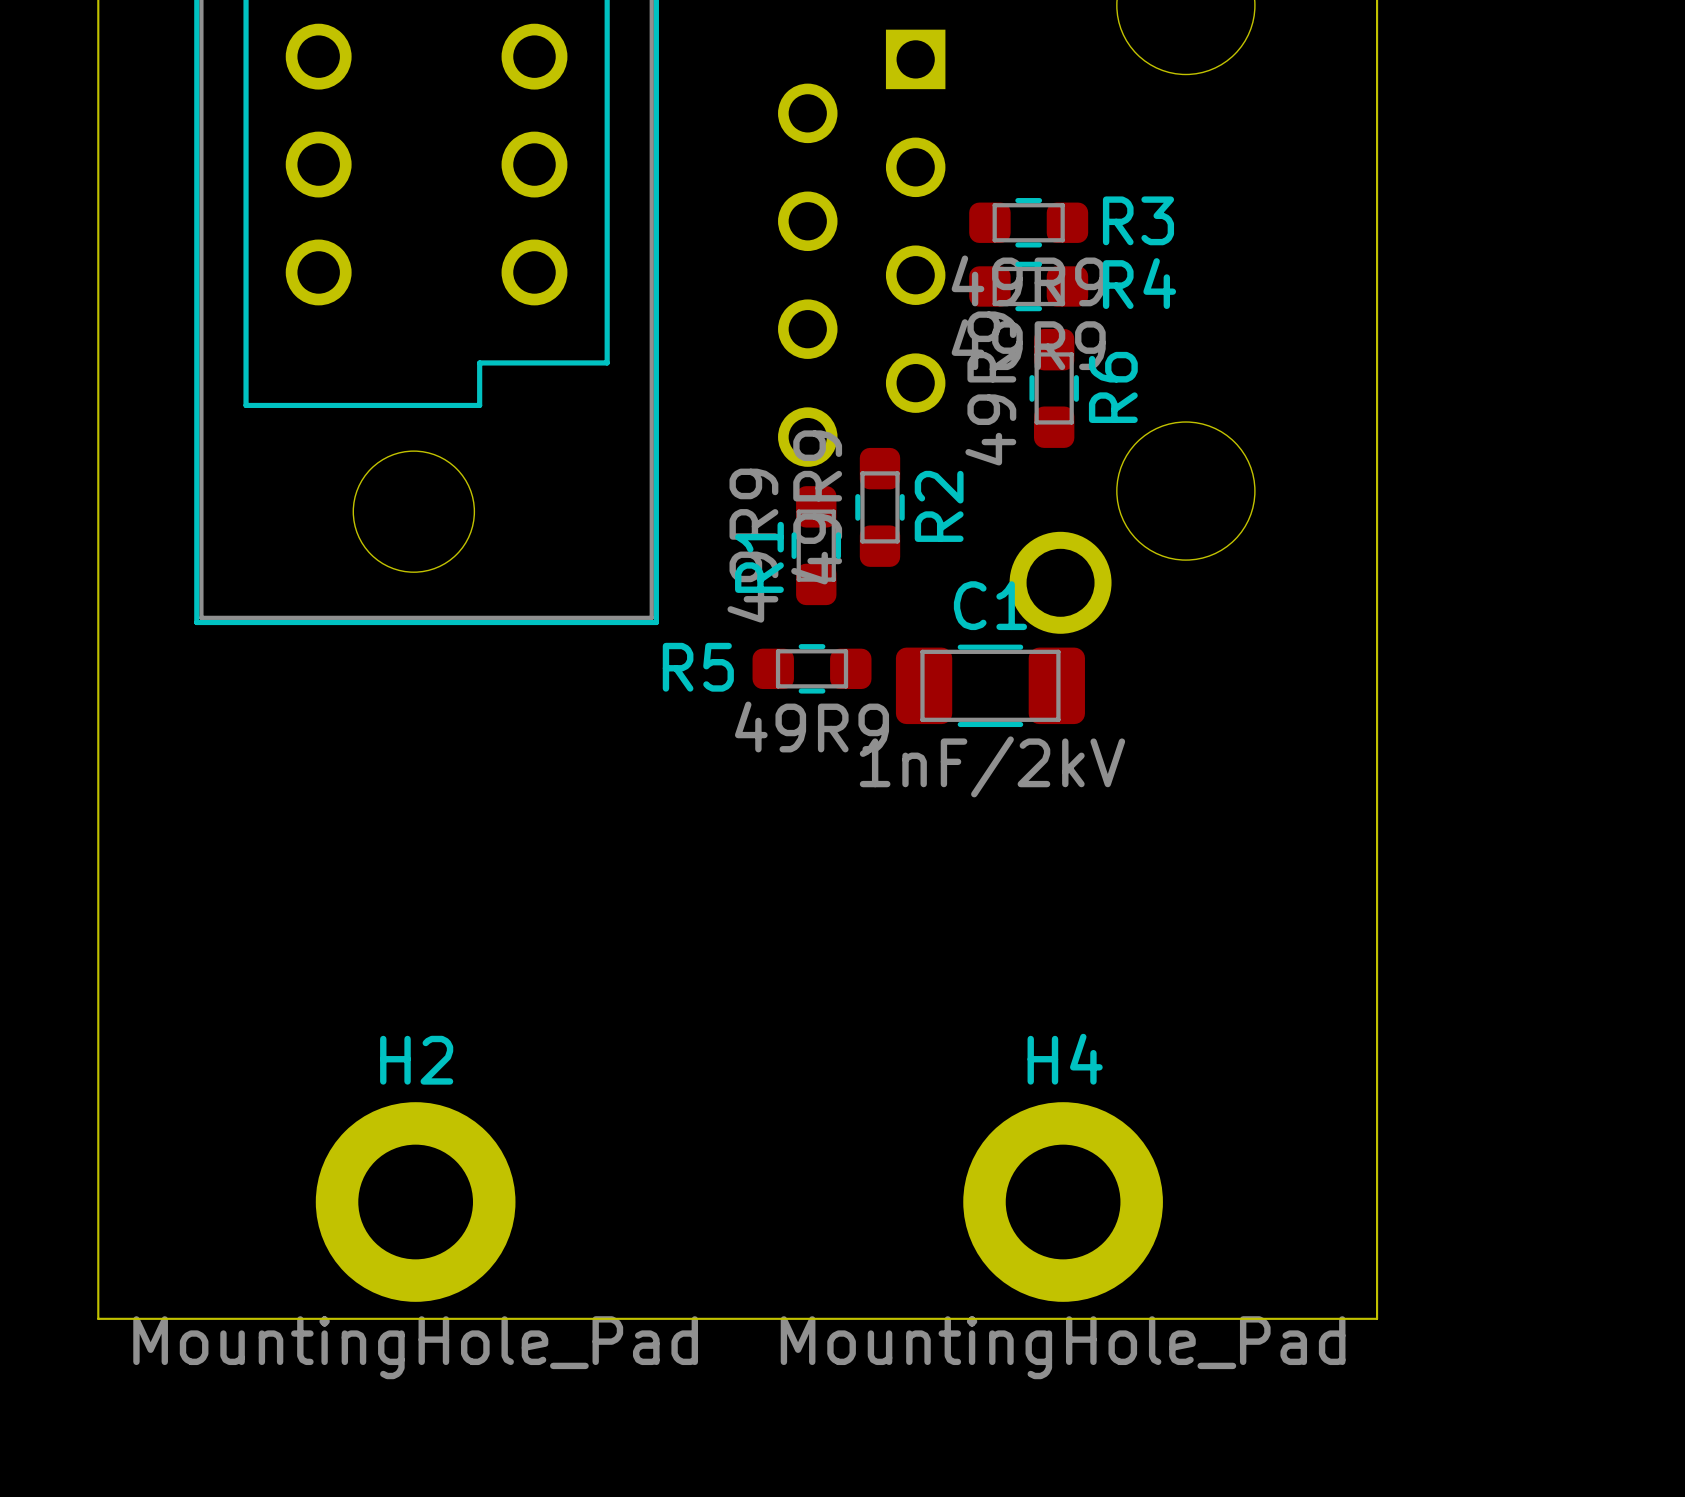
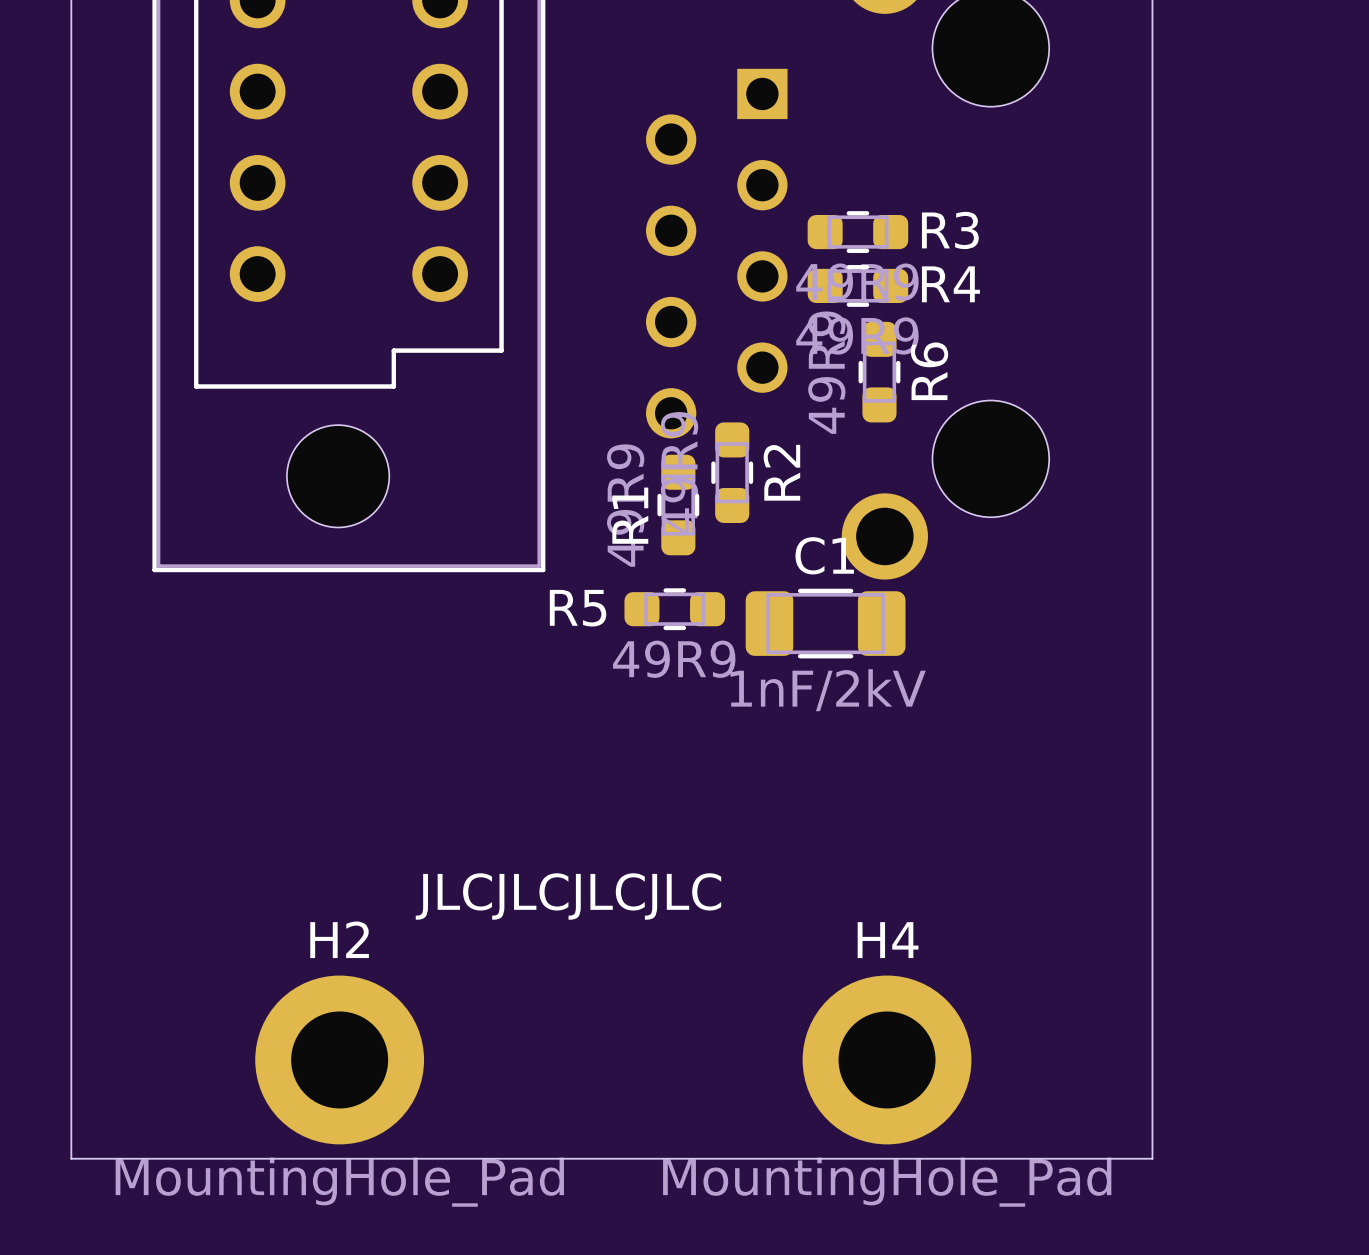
text: none -> JLCJLCJLCJLC (568, 896)

